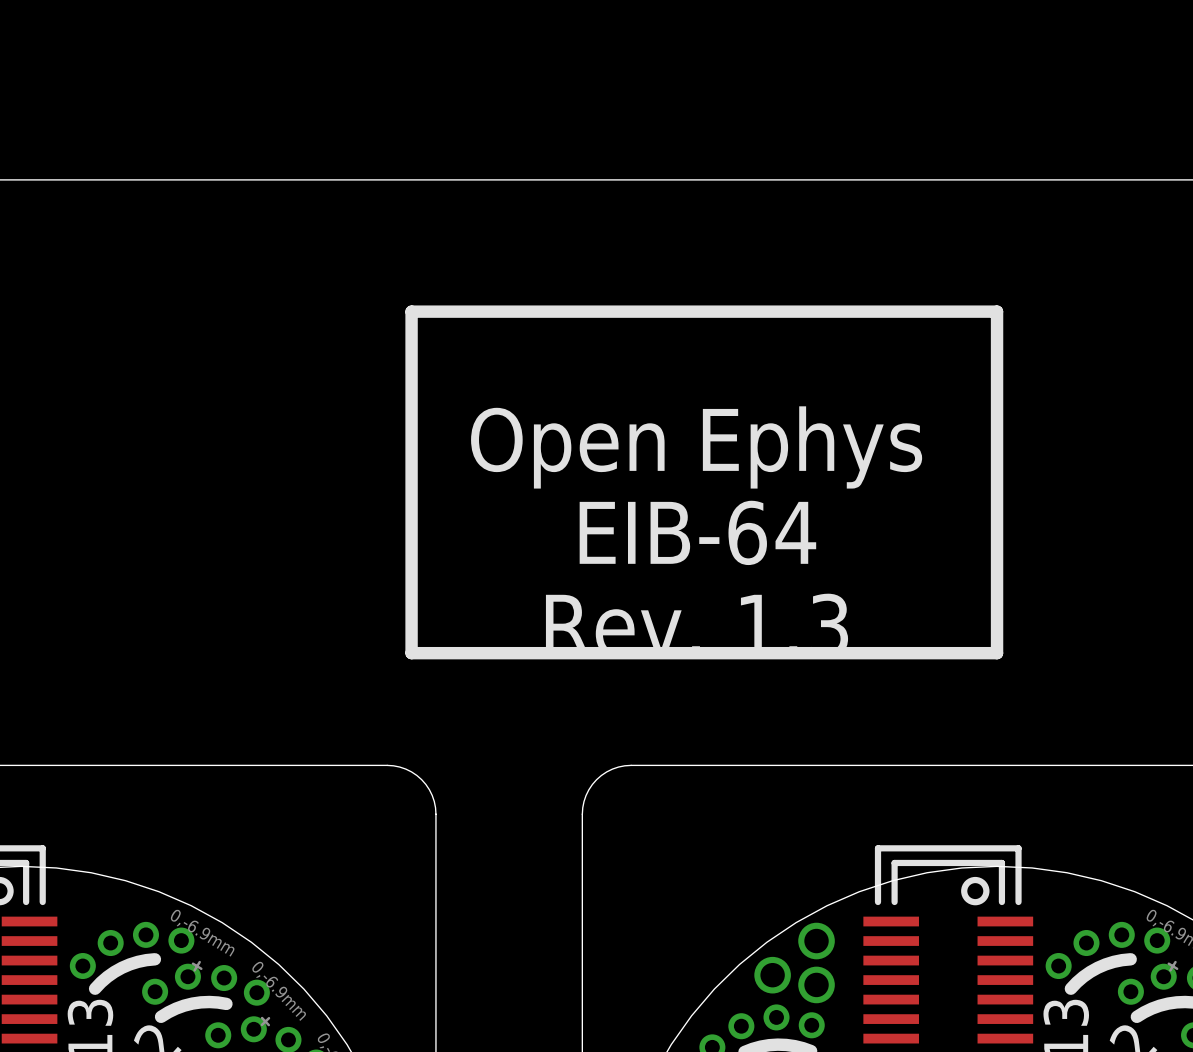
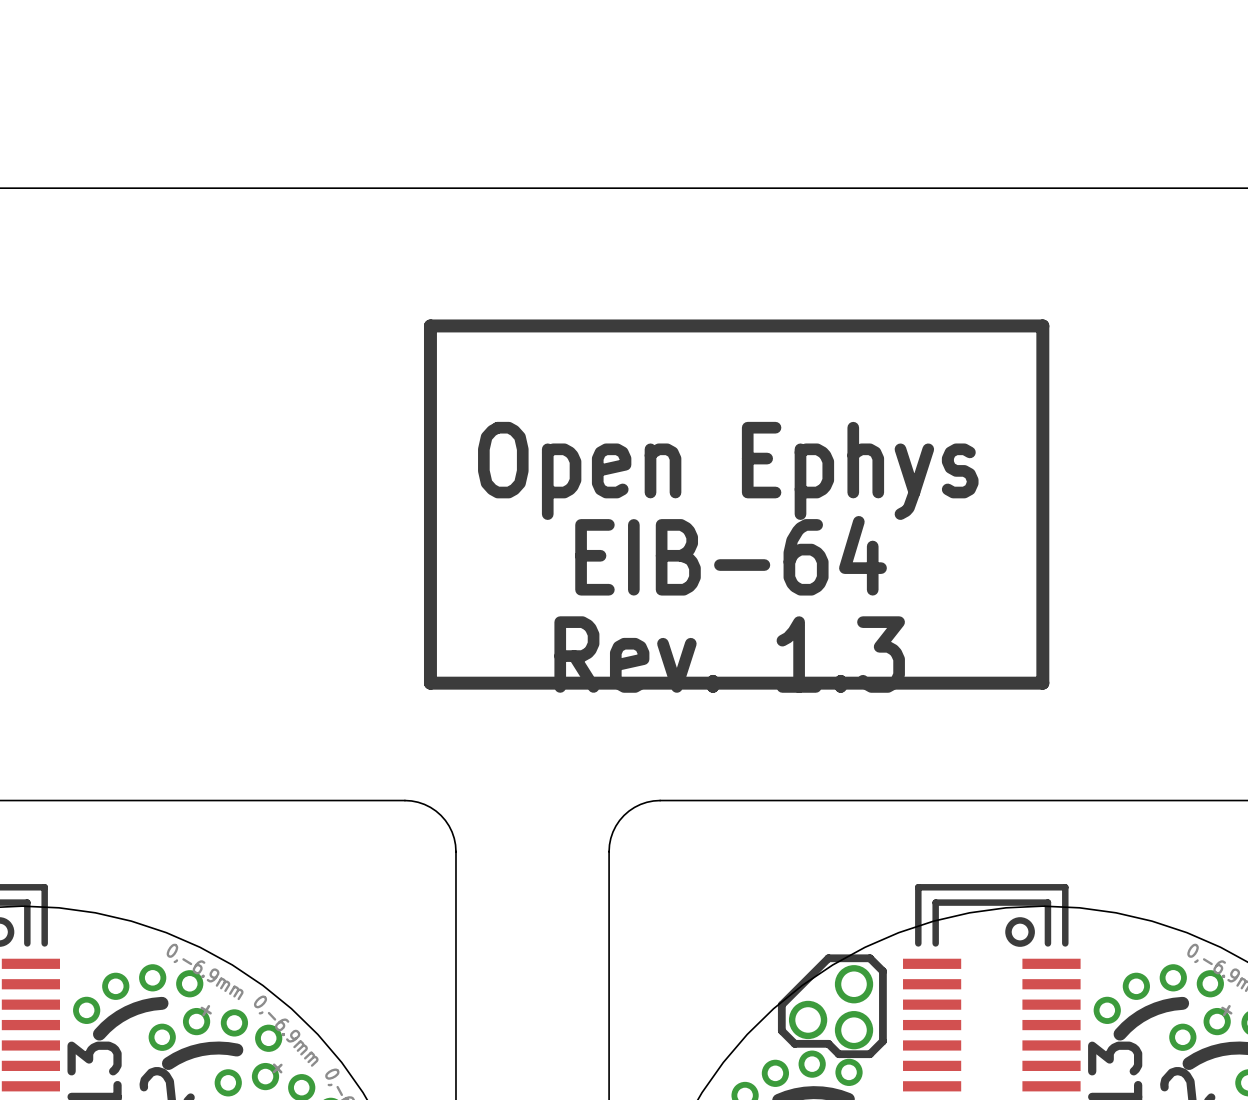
line: none -> (828, 958) (869, 958) (882, 971) (882, 1041) (869, 1054) (838, 1054) (828, 1043) (794, 1043) (781, 1030) (781, 1004) (828, 958)

